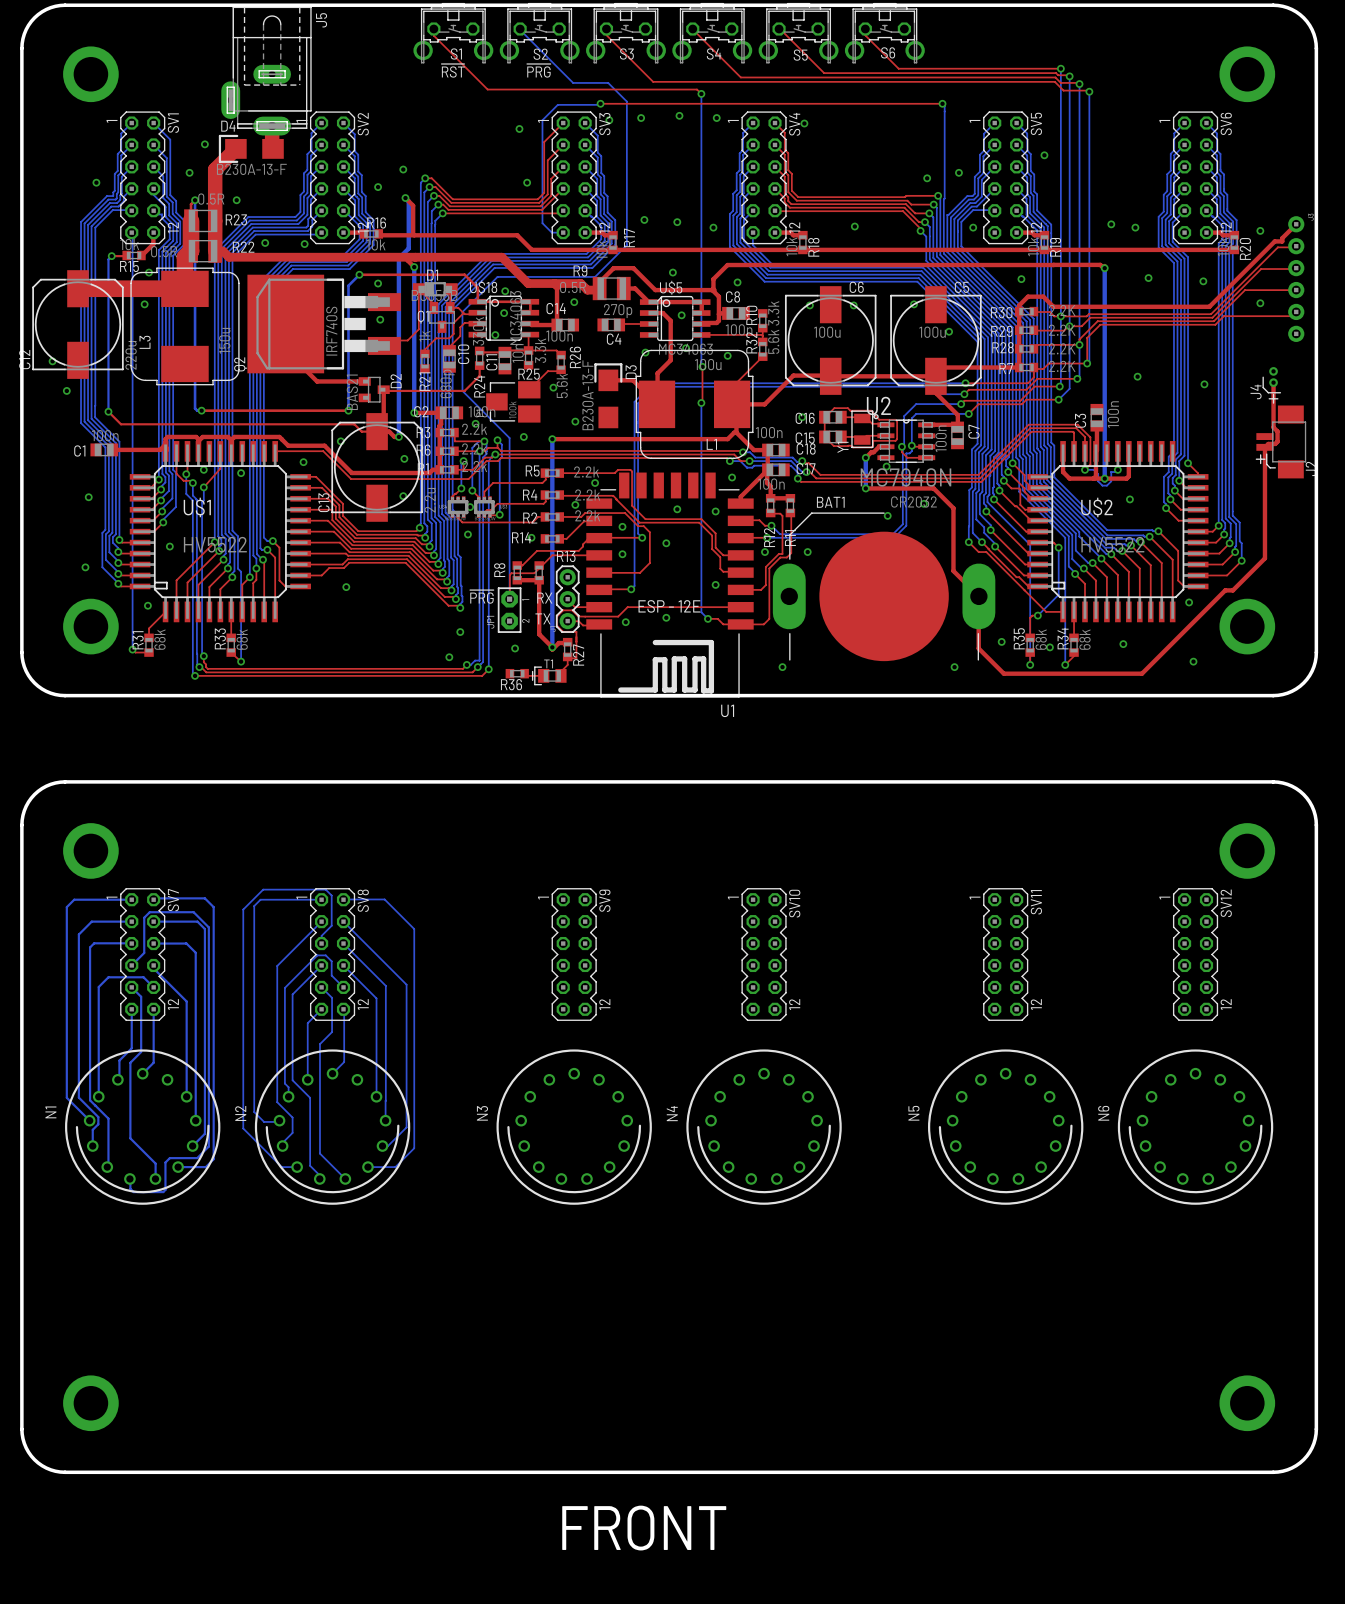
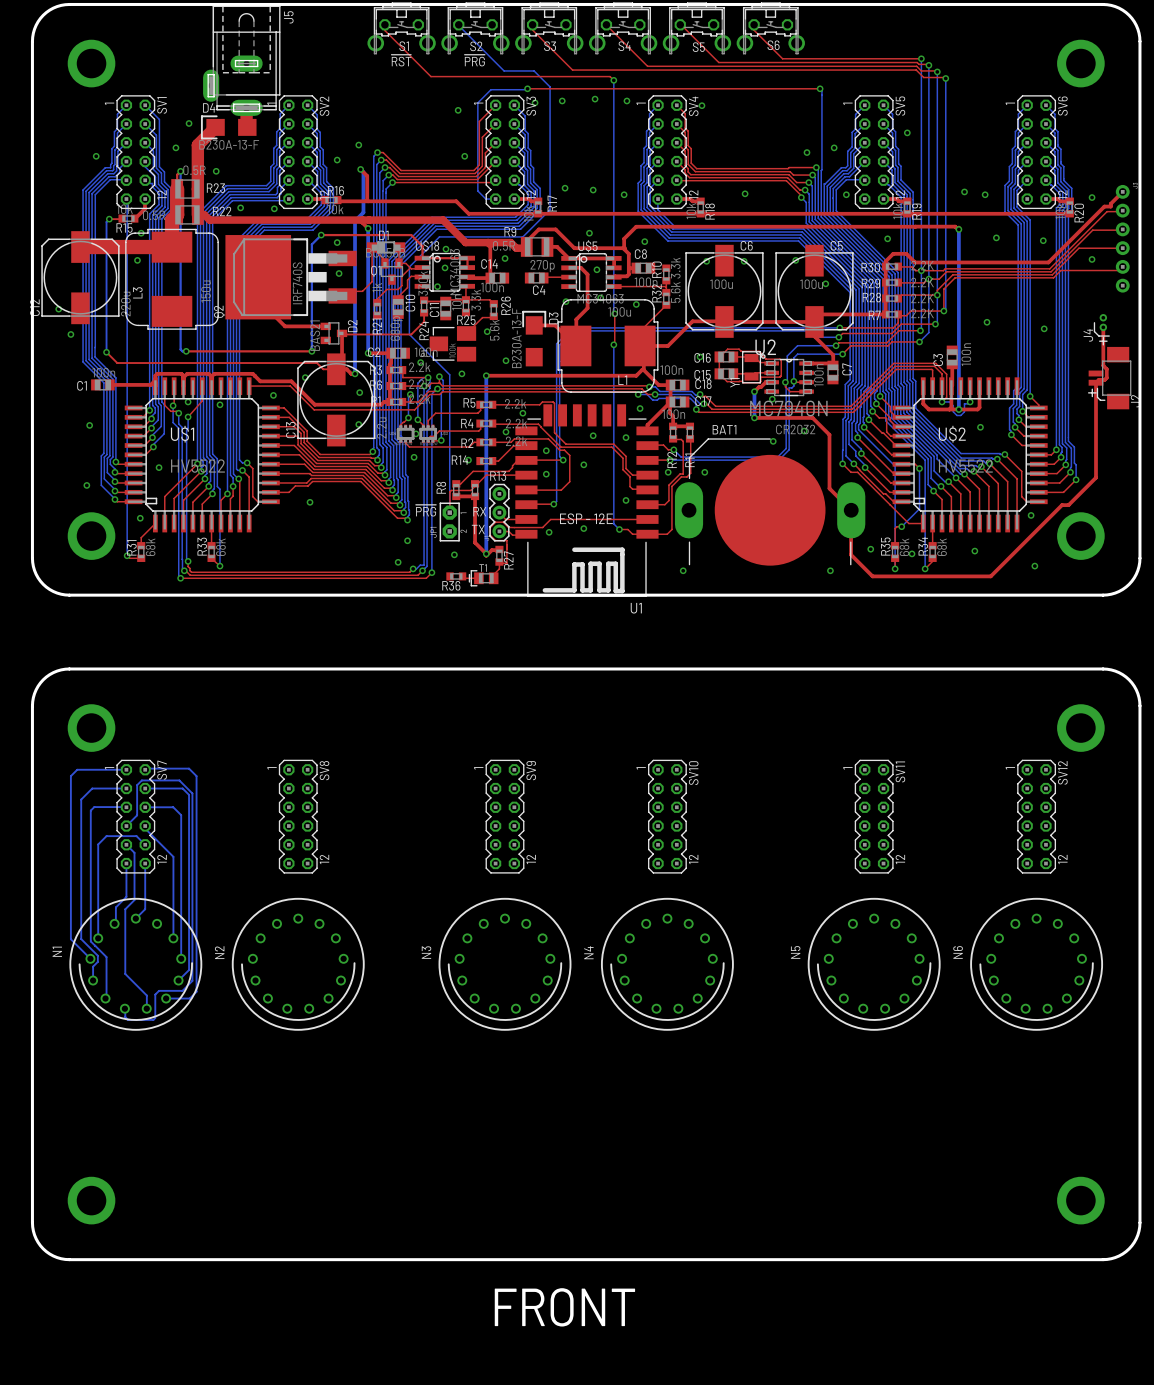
bottom track: (321, 899) (260, 899) (254, 906) (254, 1112) (264, 1121) (279, 1120) -> none
bottom track: (343, 899) (384, 899) (414, 929) (414, 1148) (395, 1167) (367, 1167) -> none
bottom track: (321, 921) (277, 965) (277, 1102) (292, 1117) (292, 1132) (282, 1142) (282, 1146) -> none
bottom track: (343, 921) (406, 984) (406, 1127) (387, 1146) (382, 1146) -> none
bottom track: (321, 943) (321, 935) (331, 925) (331, 895) (325, 889) (263, 889) (243, 909) (243, 1128) (281, 1167) (297, 1167) -> none
bottom track: (343, 943) (385, 985) (385, 1120) -> none
bottom track: (321, 965) (292, 994) (292, 1080) (310, 1097) (310, 1165) (319, 1175) (319, 1178) -> none
bottom track: (343, 965) (376, 998) (376, 1096) -> none
bottom track: (321, 987) (332, 997) (332, 1032) (319, 1044) (319, 1153) (345, 1178) -> none
bottom track: (343, 987) (331, 975) (331, 961) (325, 955) (317, 955) (284, 987) (284, 1083) (288, 1087) (288, 1096) -> none
bottom track: (321, 1009) (307, 1023) (307, 1079) -> none
bottom track: (344, 1009) (344, 1062) (332, 1073) -> none

